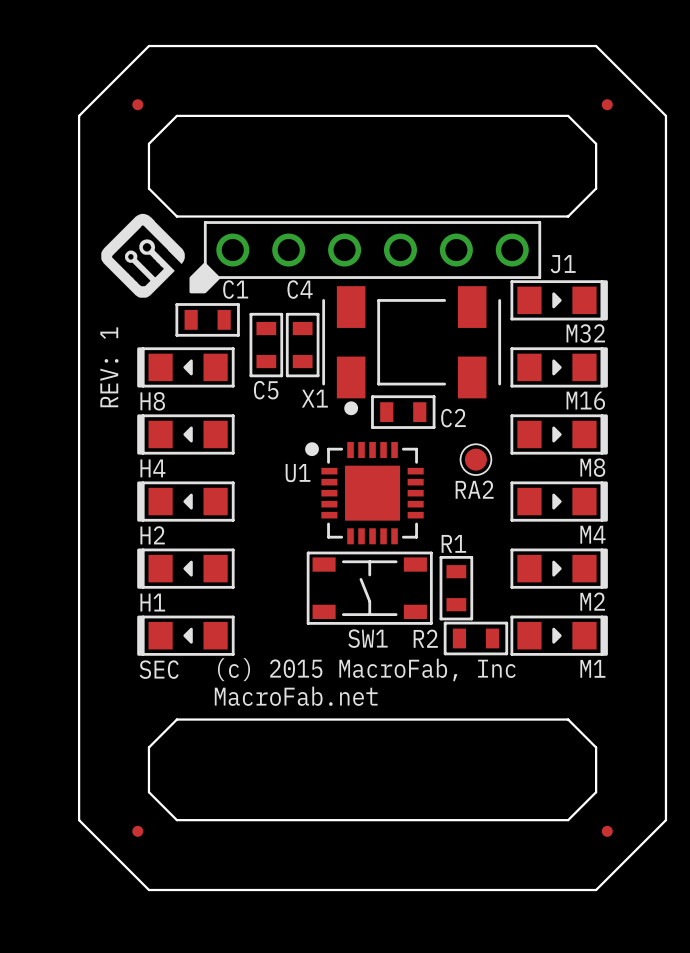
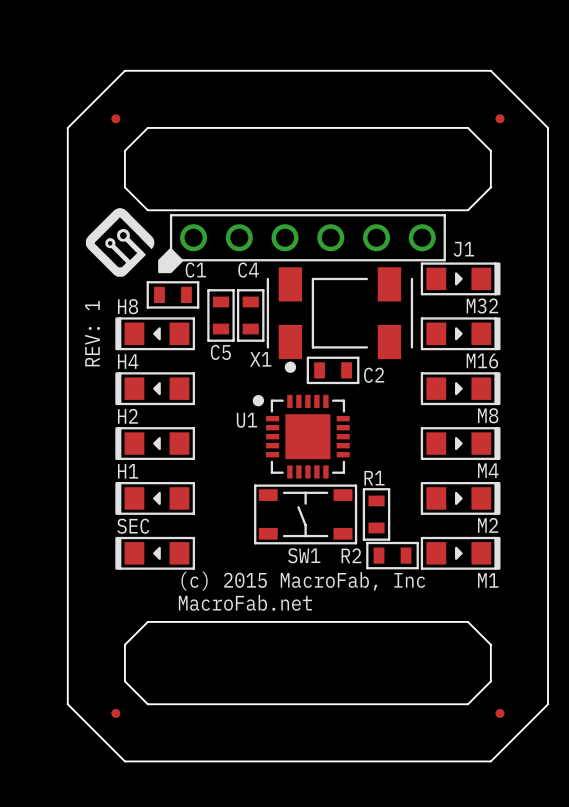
H8 name position: H8 (152, 401) -> H8 (128, 306)
RA2: (475, 459) -> none
H4 name position: H4 (152, 468) -> H4 (128, 361)
H2 name position: H2 (152, 535) -> H2 (127, 416)
H1 name position: H1 (152, 602) -> H1 (128, 471)
SEC name position: SEC (159, 669) -> SEC (133, 526)

